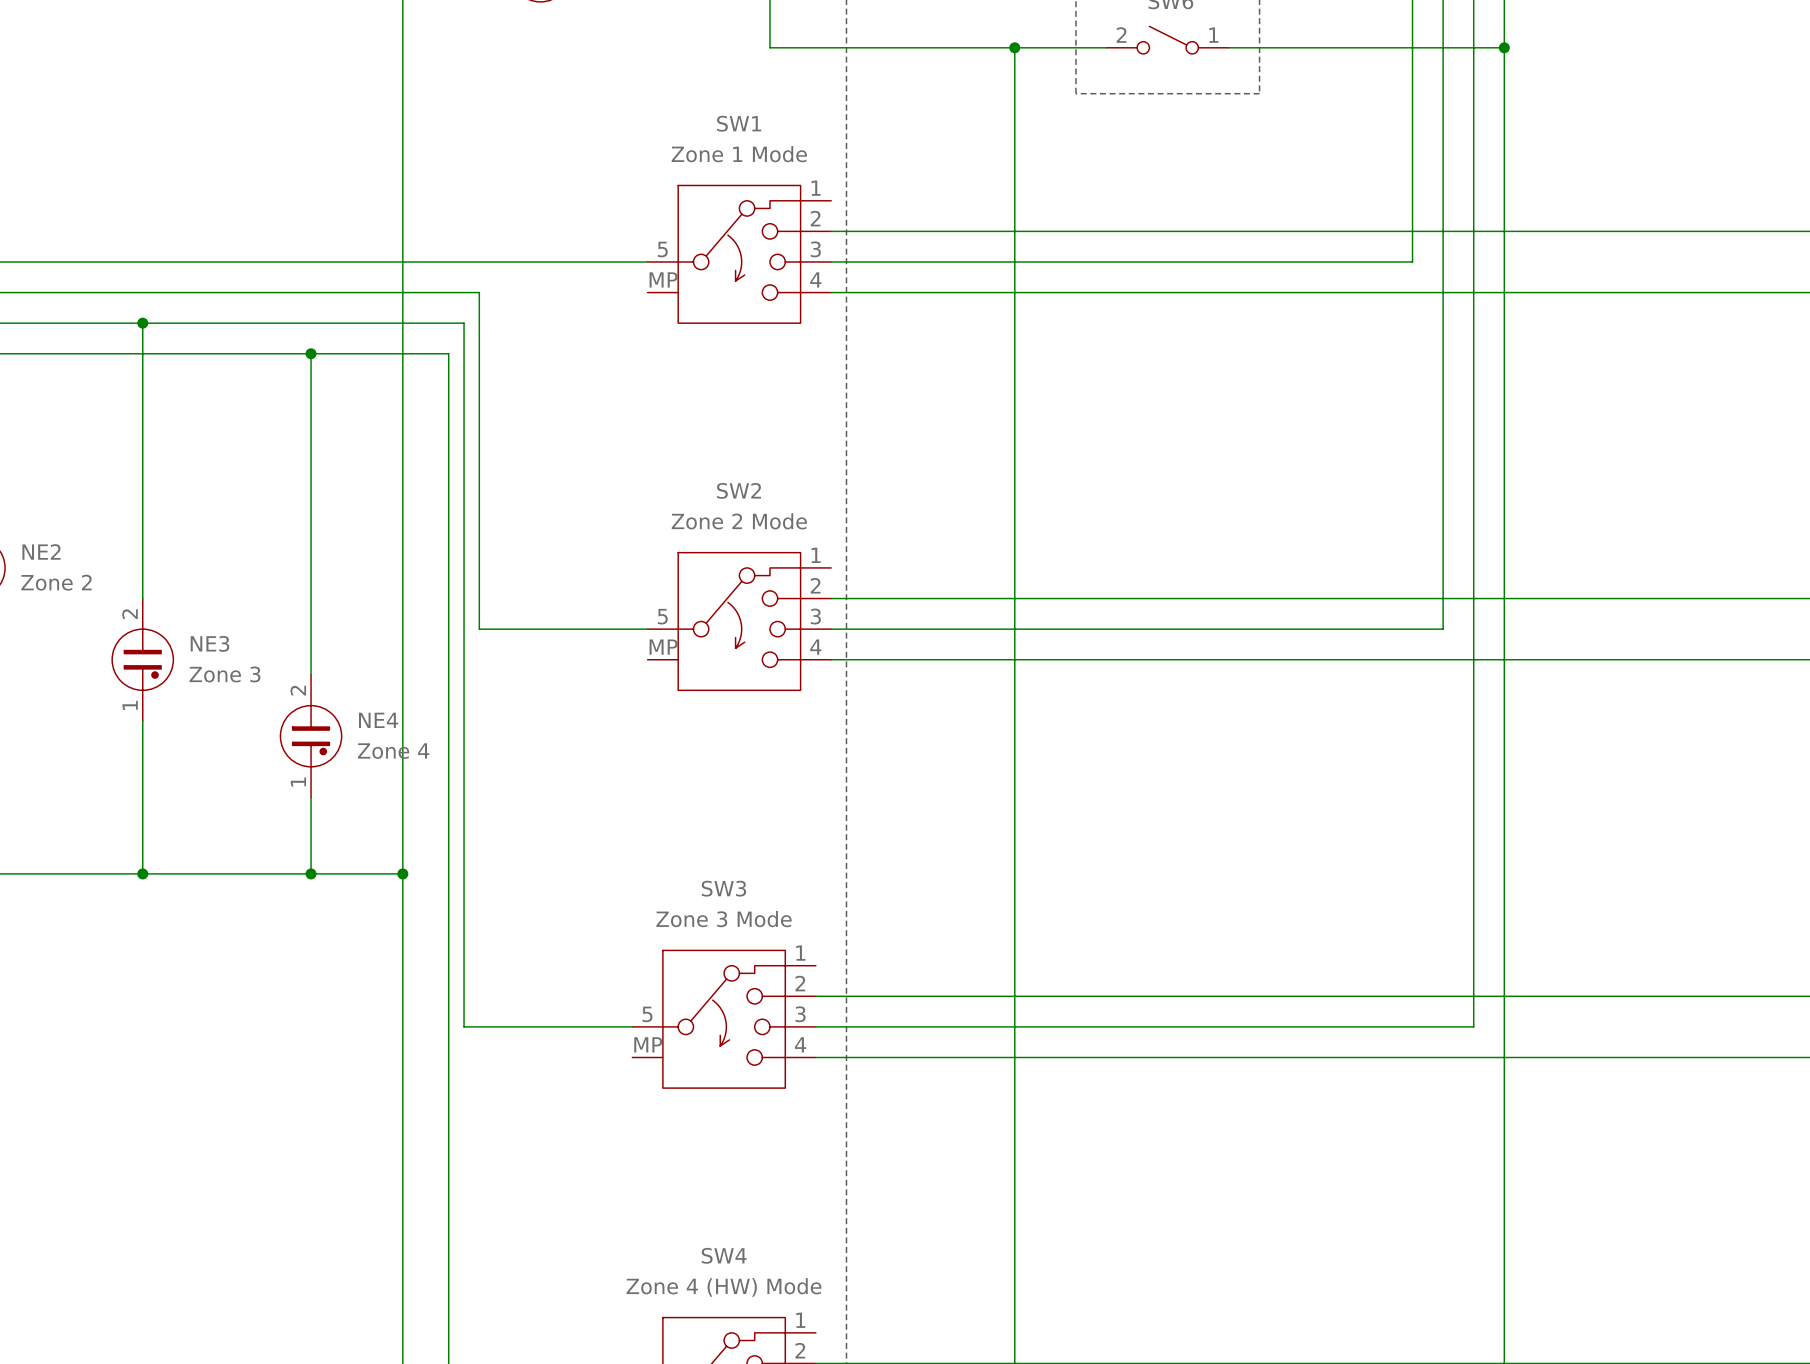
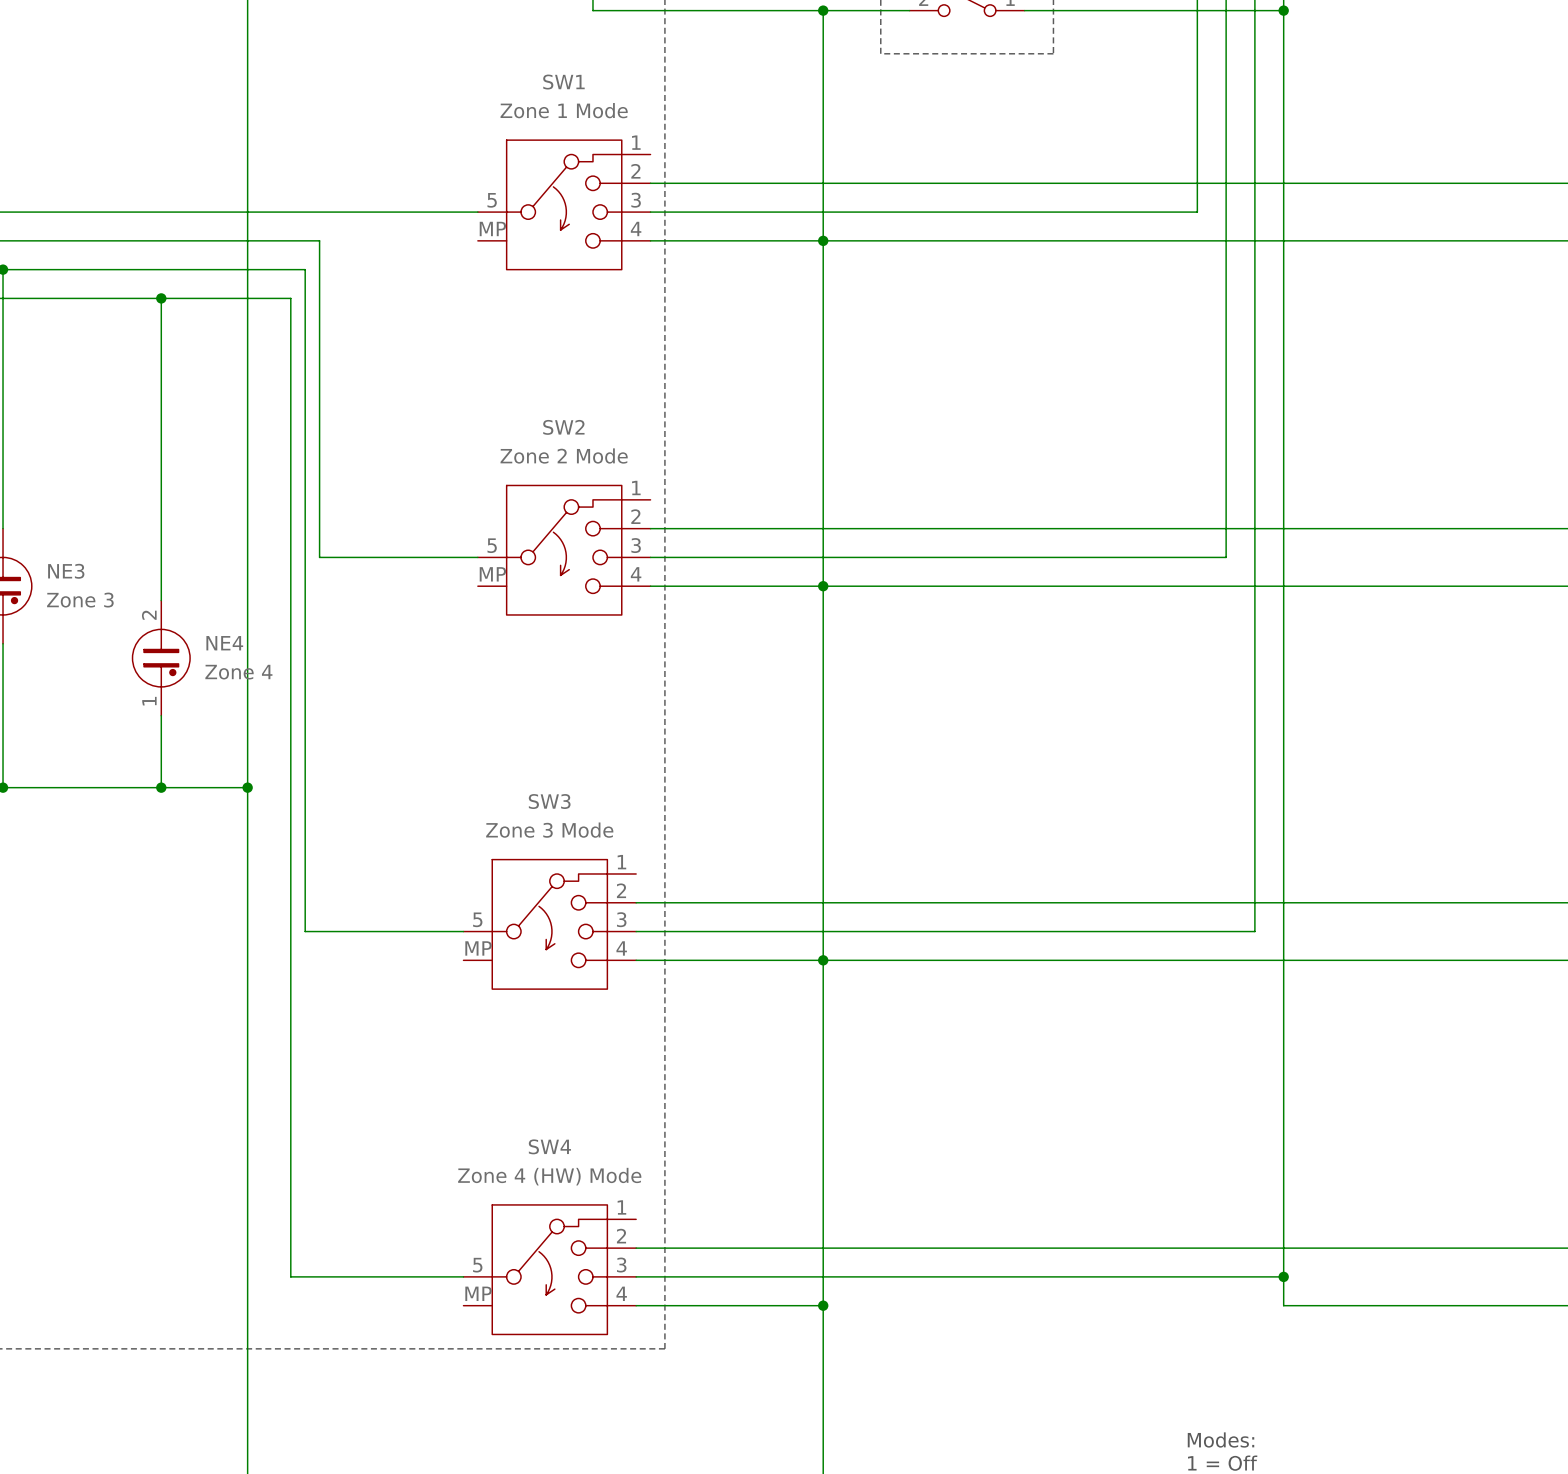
junction: none -> (823, 240)
junction: none -> (823, 586)
junction: none -> (823, 960)

